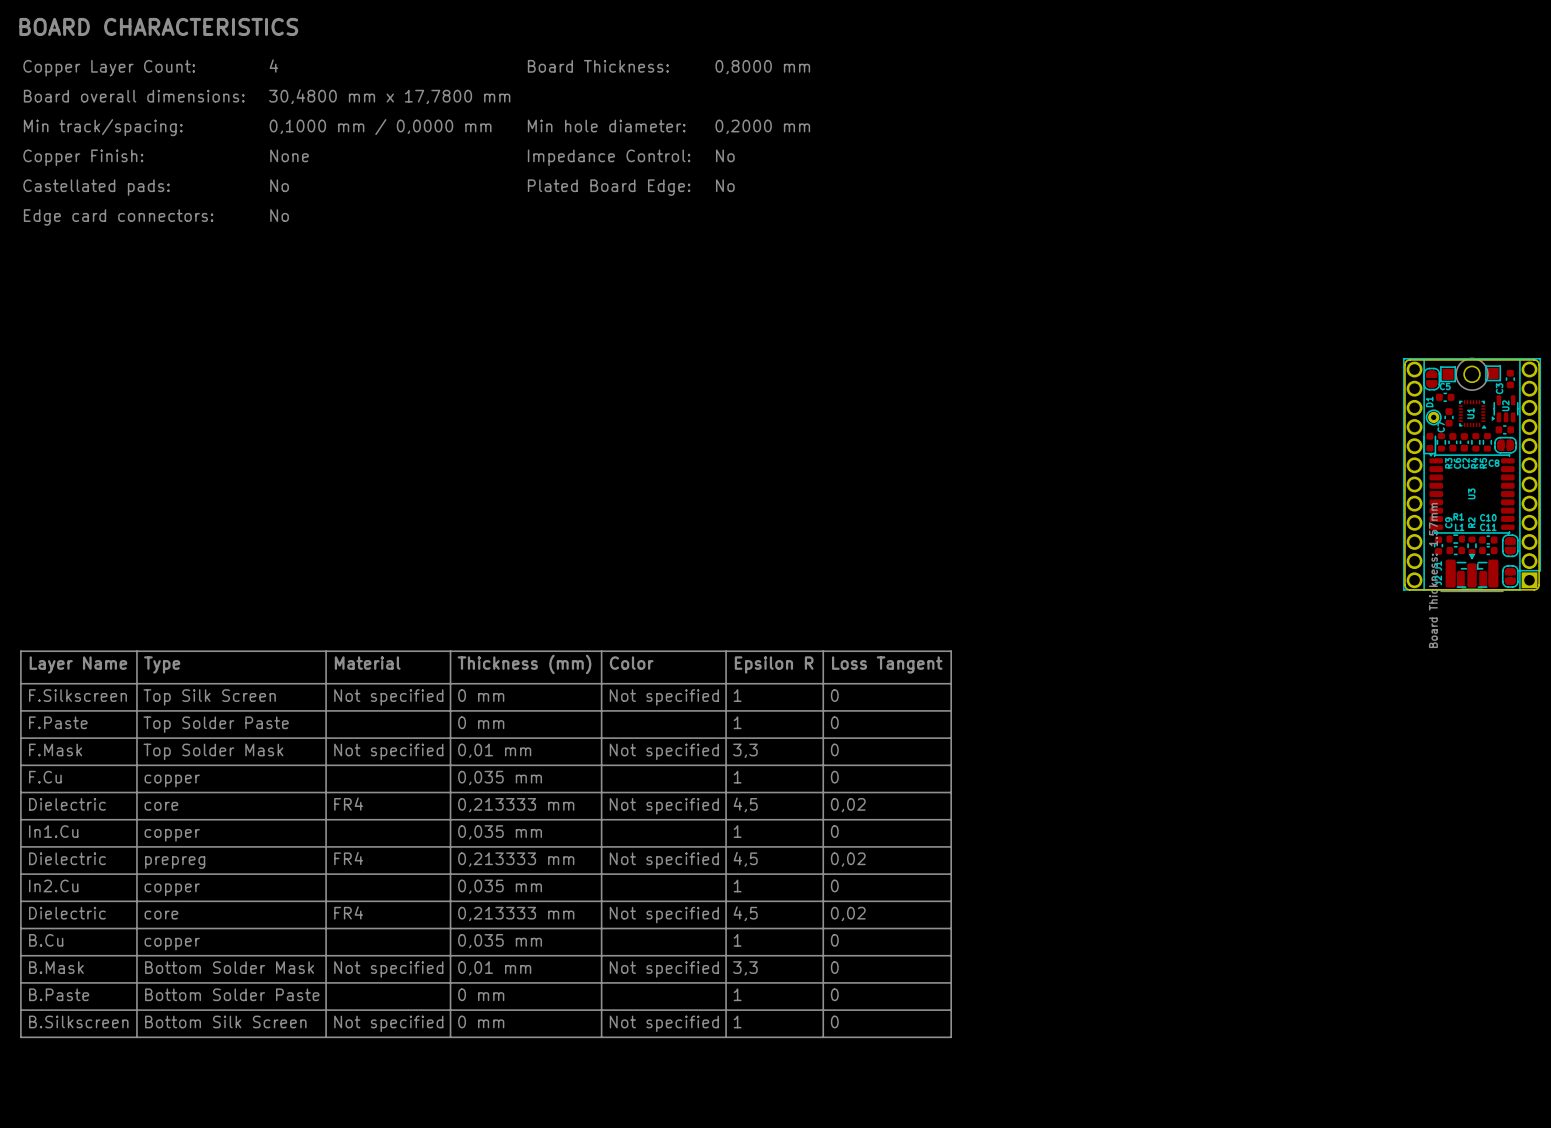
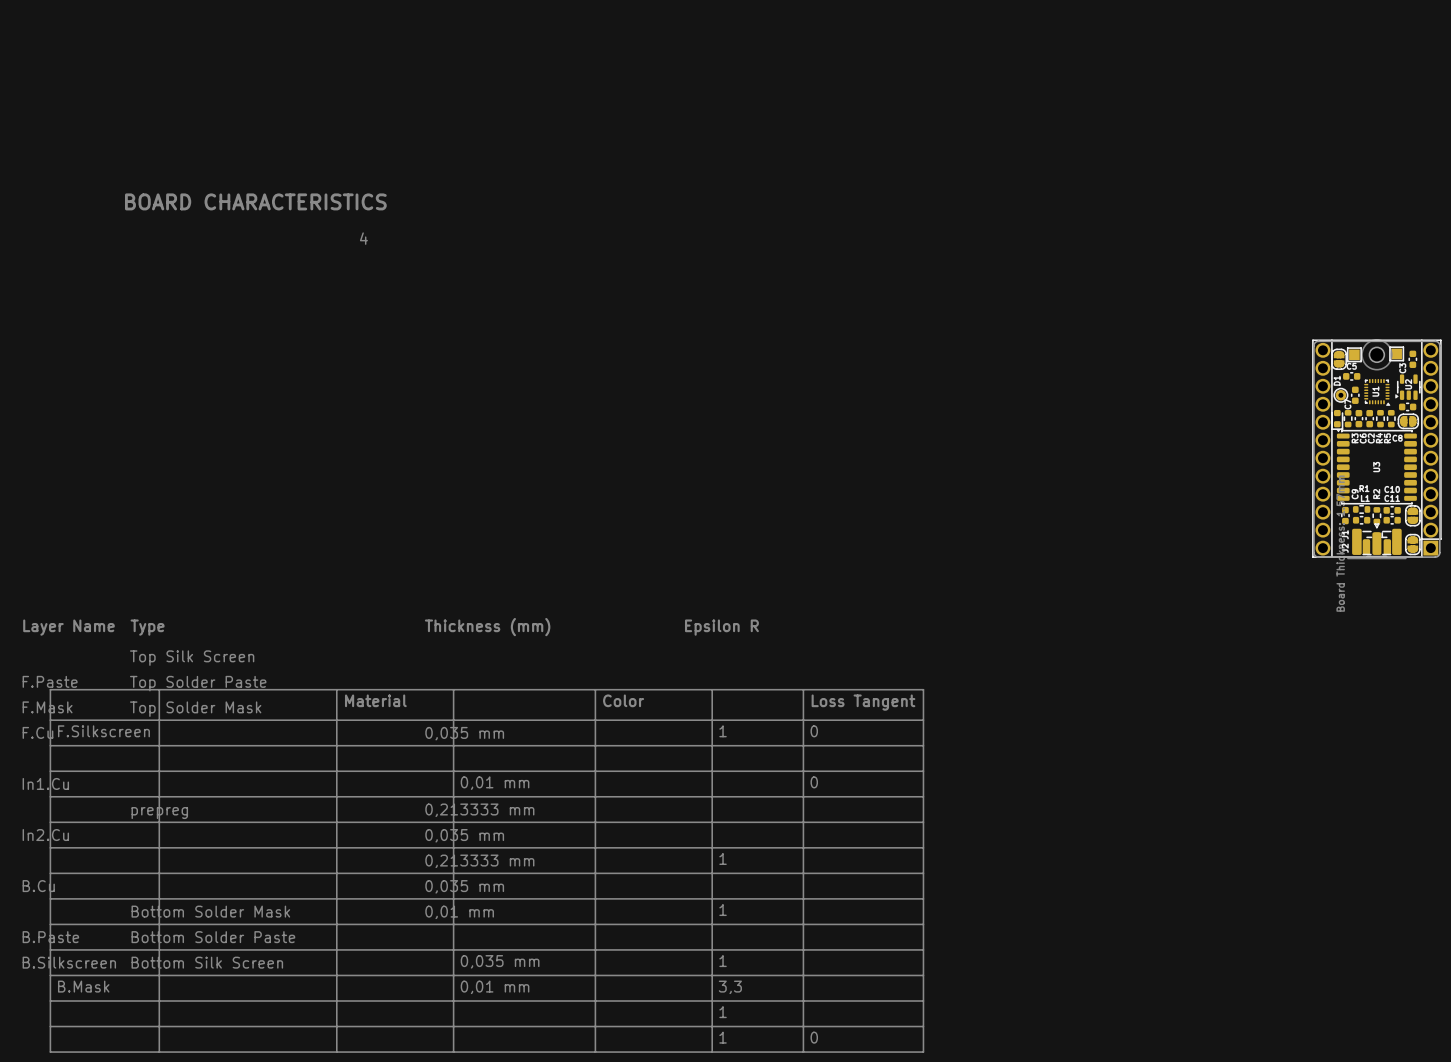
text: BOARD CHARACTERISTICS (158, 26) -> none
text: 4 (273, 66) -> none
text: Board Thickness: (598, 66) -> none
text: 0,8000 mm (762, 67) -> none
text: Copper Layer Count: (109, 68) -> none
text: Board overall dimensions: (134, 96) -> none
text: 30,4800 mm x 17,7800 mm (389, 96) -> none
text: Min hole diameter: (606, 126) -> none
text: 0,2000 mm (762, 126) -> none
text: Min track/spacing: (103, 127) -> none
text: 0,1000 mm / 0,0000 mm (380, 127) -> none
text: None (289, 155) -> none
text: No (725, 155) -> none
text: Copper Finish: (83, 157) -> none
text: Impedance Control: (609, 157) -> none
text: No (279, 185) -> none
text: No (725, 185) -> none
text: Castellated pads: (96, 187) -> none
text: Plated Board Edge: (609, 187) -> none
text: none -> BOARD CHARACTERISTICS (255, 201)
text: No (279, 215) -> none
text: Edge card connectors: (118, 217) -> none
text: none -> 4 (363, 238)
line: (20, 651) (951, 651) (951, 1037) (20, 1037) (20, 651) -> (50, 689) (923, 689) (923, 1052) (50, 1052) (50, 689)
line: (136, 651) (136, 1037) -> (159, 689) (159, 1052)
line: (326, 651) (326, 1037) -> (336, 689) (336, 1052)
line: (450, 651) (450, 1037) -> (453, 689) (453, 1052)
line: (601, 651) (601, 1037) -> (595, 689) (595, 1052)
line: (726, 651) (726, 1037) -> (712, 689) (712, 1052)
line: (823, 651) (823, 1037) -> (803, 689) (803, 1052)
text position: Material (367, 663) -> Material (375, 700)
text position: Color (631, 663) -> Color (623, 700)
text position: Loss Tangent (887, 664) -> Loss Tangent (863, 702)
line: (20, 683) (951, 683) -> (50, 720) (923, 720)
text position: F.Silkscreen (77, 695) -> F.Silkscreen (103, 731)
text: 0 mm (481, 695) -> none
text: 1 (737, 695) -> none
text: 0 (834, 695) -> none
text: Not specified (388, 697) -> none
text: Not specified (664, 697) -> none
line: (20, 710) (951, 710) -> (50, 745) (923, 745)
text: 0 mm (481, 722) -> none
text: 1 (737, 722) -> none
text: 0 (834, 722) -> none
line: (20, 738) (951, 738) -> (50, 771) (923, 771)
text: 0 (834, 749) -> none
text position: 0,01 mm (494, 750) -> 0,01 mm (495, 783)
text: 3,3 (745, 750) -> none
text: Not specified (388, 751) -> none
text: Not specified (664, 751) -> none
line: (20, 765) (951, 765) -> (50, 796) (923, 796)
text: none -> 1 (723, 731)
text: none -> 0 (814, 731)
text: 1 (737, 777) -> none
text: 0 (834, 777) -> none
text: copper (172, 780) -> none
line: (20, 792) (951, 792) -> (50, 822) (923, 822)
text: Dielectric (67, 804) -> none
text: FR4 (348, 804) -> none
text: 4,5 (745, 804) -> none
text: 0,213333 mm (516, 805) -> none
text: 0,02 (848, 805) -> none
text: core (161, 806) -> none
text: Not specified (664, 806) -> none
line: (20, 819) (951, 819) -> (50, 847) (923, 847)
text: none -> 0 (814, 782)
text: 1 (737, 831) -> none
text: 0 (834, 831) -> none
text: 0,035 mm (500, 832) -> none
text: copper (172, 835) -> none
line: (20, 846) (951, 846) -> (50, 873) (923, 873)
text: Dielectric (67, 858) -> none
text: FR4 (348, 858) -> none
text: 4,5 (745, 859) -> none
text: 0,02 (848, 859) -> none
text: Not specified (664, 860) -> none
line: (20, 874) (951, 874) -> (50, 898) (923, 898)
text: 1 (737, 885) -> none
text: 0 (834, 885) -> none
text: copper (172, 889) -> none
line: (20, 901) (951, 901) -> (50, 924) (923, 924)
text: none -> 1 (723, 858)
text: FR4 (348, 912) -> none
text: Dielectric (67, 913) -> none
text: 4,5 (745, 913) -> none
text: 0,02 (848, 913) -> none
text: core (161, 915) -> none
text: Not specified (664, 915) -> none
line: (20, 928) (951, 928) -> (50, 949) (923, 949)
text: 1 (737, 940) -> none
text: 0 (834, 940) -> none
text: copper (172, 944) -> none
line: (20, 955) (951, 955) -> (50, 975) (923, 975)
text: none -> 1 (723, 910)
text position: B.Mask (56, 967) -> B.Mask (83, 986)
text: 0 (834, 967) -> none
text position: 3,3 (745, 968) -> 3,3 (730, 987)
text: Not specified (388, 969) -> none
text: Not specified (664, 969) -> none
line: (20, 982) (951, 982) -> (50, 1001) (923, 1001)
text: 0 mm (481, 994) -> none
text: 1 (737, 994) -> none
text: 0 (834, 994) -> none
line: (20, 1010) (951, 1010) -> (50, 1026) (923, 1026)
text: none -> 1 (723, 961)
text: 0 mm (481, 1021) -> 0,035 mm (500, 961)
text: 1 (737, 1021) -> none
text: 0 (834, 1021) -> none
text: Not specified (388, 1023) -> none
text: Not specified (664, 1023) -> none
text: none -> 0,01 mm (495, 987)
text: none -> 1 (723, 1012)
text: none -> 1 (723, 1037)
text: none -> 0 (814, 1037)

